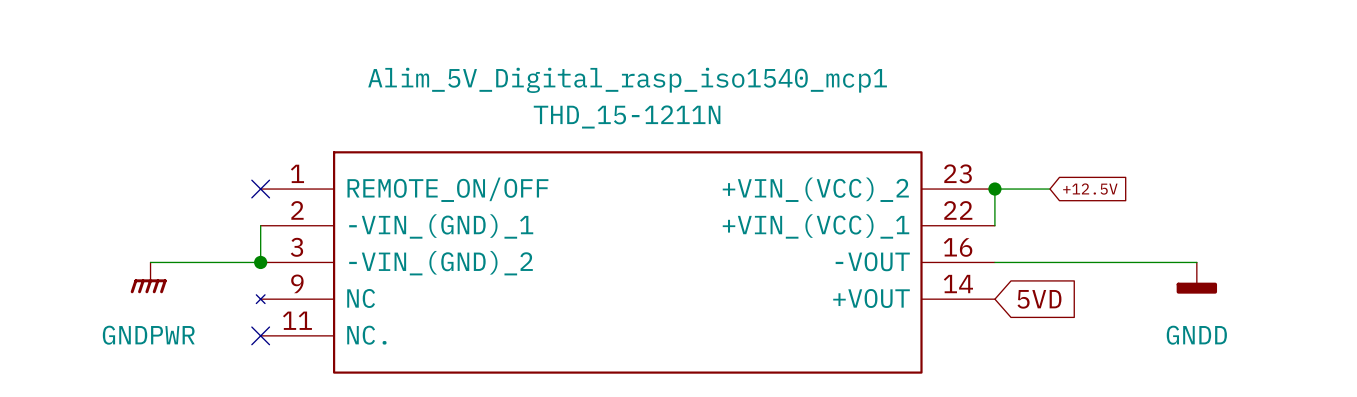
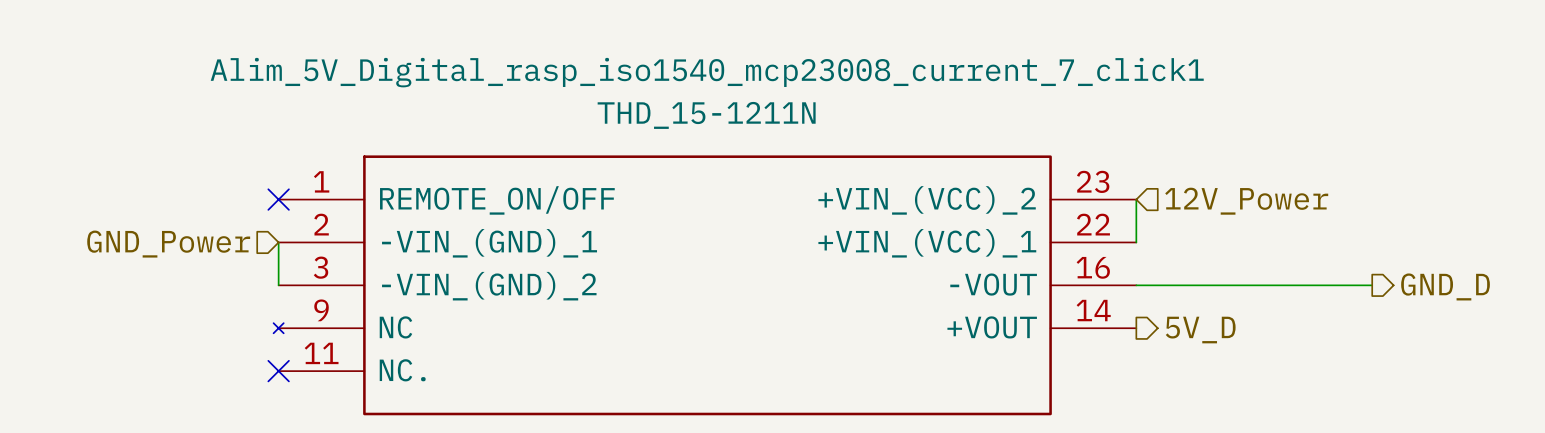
Alim_5V_Digital_rasp_iso1540_mcp1 name: Alim_5V_Digital_rasp_iso1540_mcp1 (627, 80) -> Alim_5V_Digital_rasp_iso1540_mcp23008_current_7_click1 (707, 72)
wire: (994, 189) (1049, 189) -> none
junction: (994, 189) -> none
global label: +12.5V (1090, 189) -> none
hierarchical label: none -> 12V_Power (1246, 201)
hierarchical label: none -> GND_Power (168, 244)
wire: (150, 262) (260, 262) -> none
junction: (260, 262) -> none
hierarchical label: none -> GND_D (1445, 286)
power symbol: GNDPWR (148, 277) -> none
power symbol: GNDD (1196, 278) -> none
global label: 5VD (1039, 299) -> none
hierarchical label: none -> 5V_D (1200, 330)

